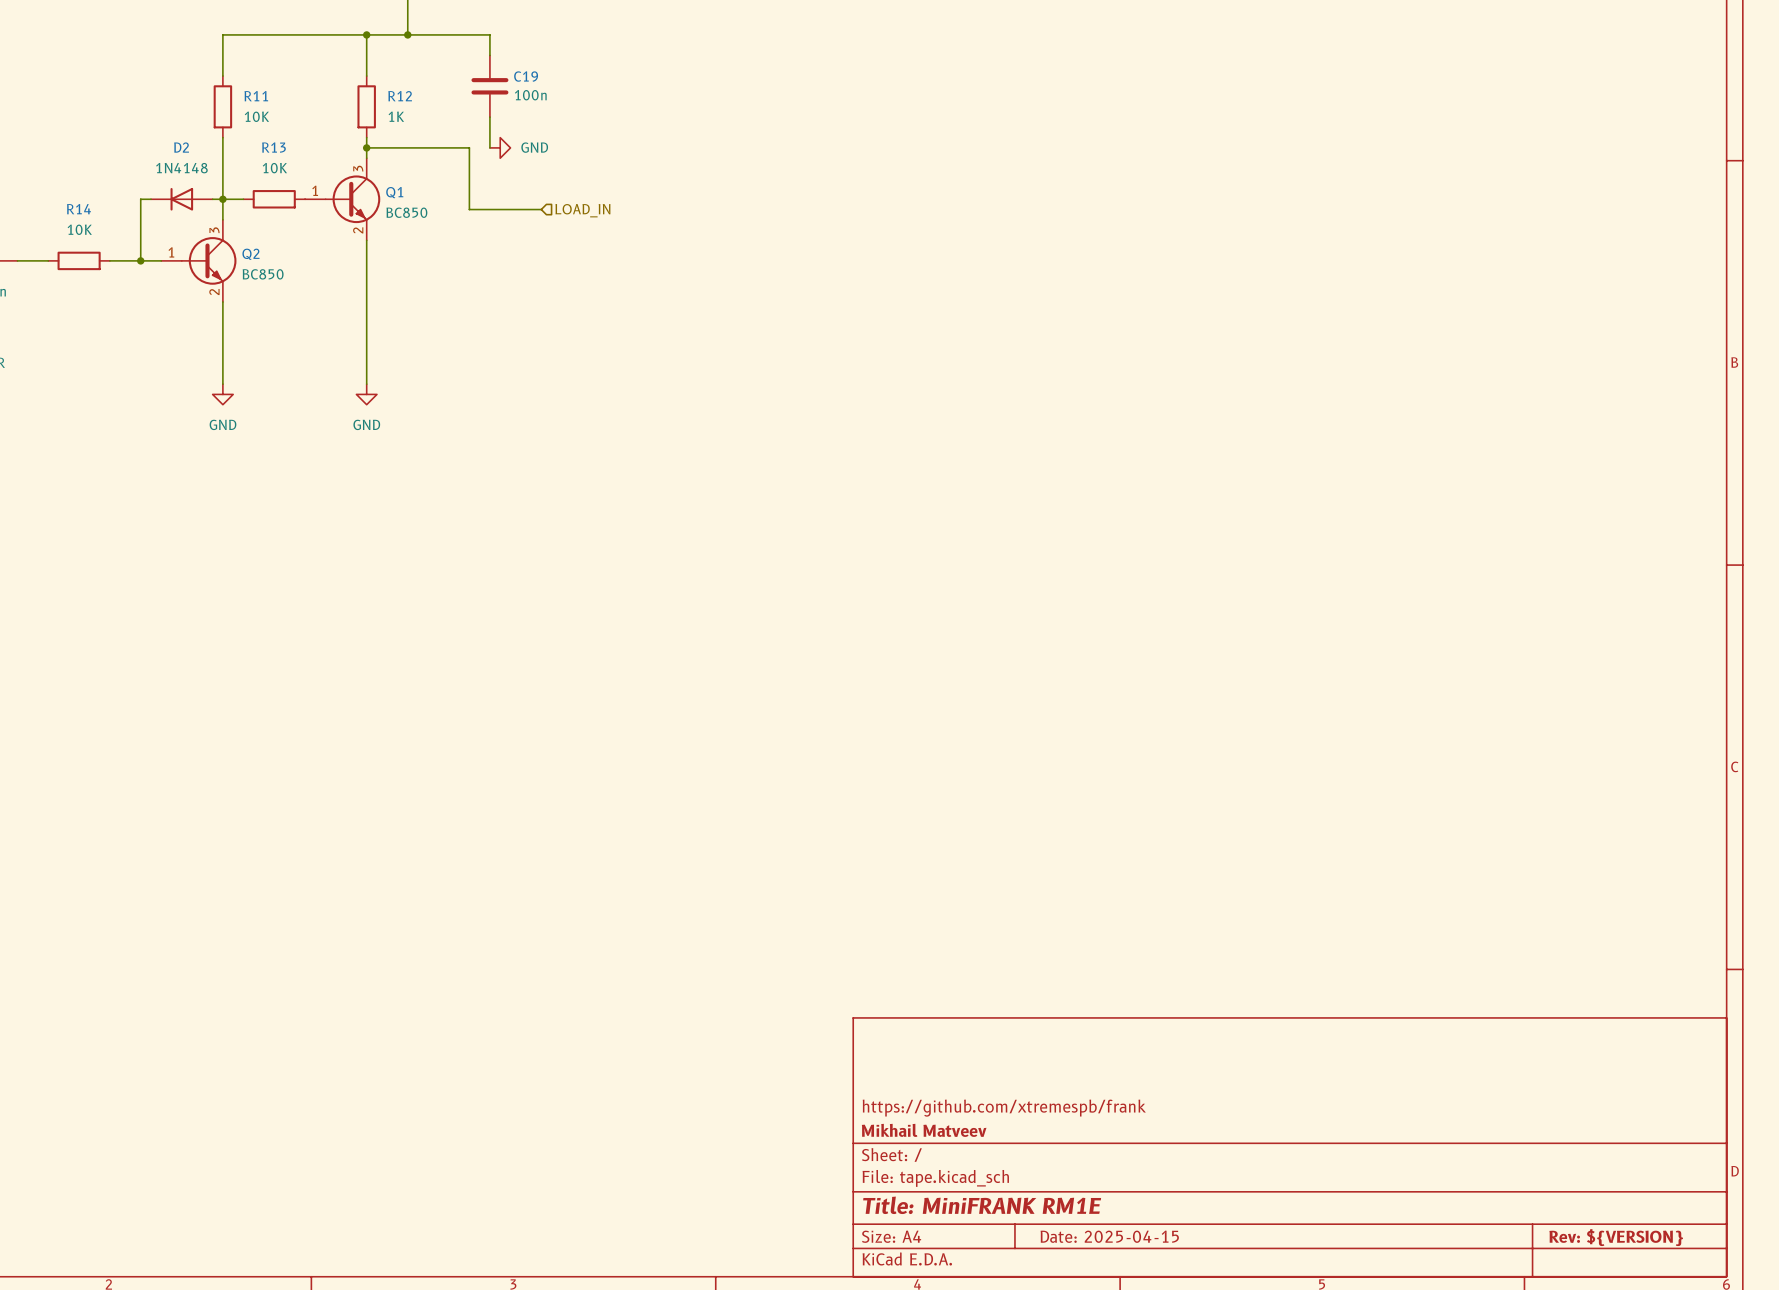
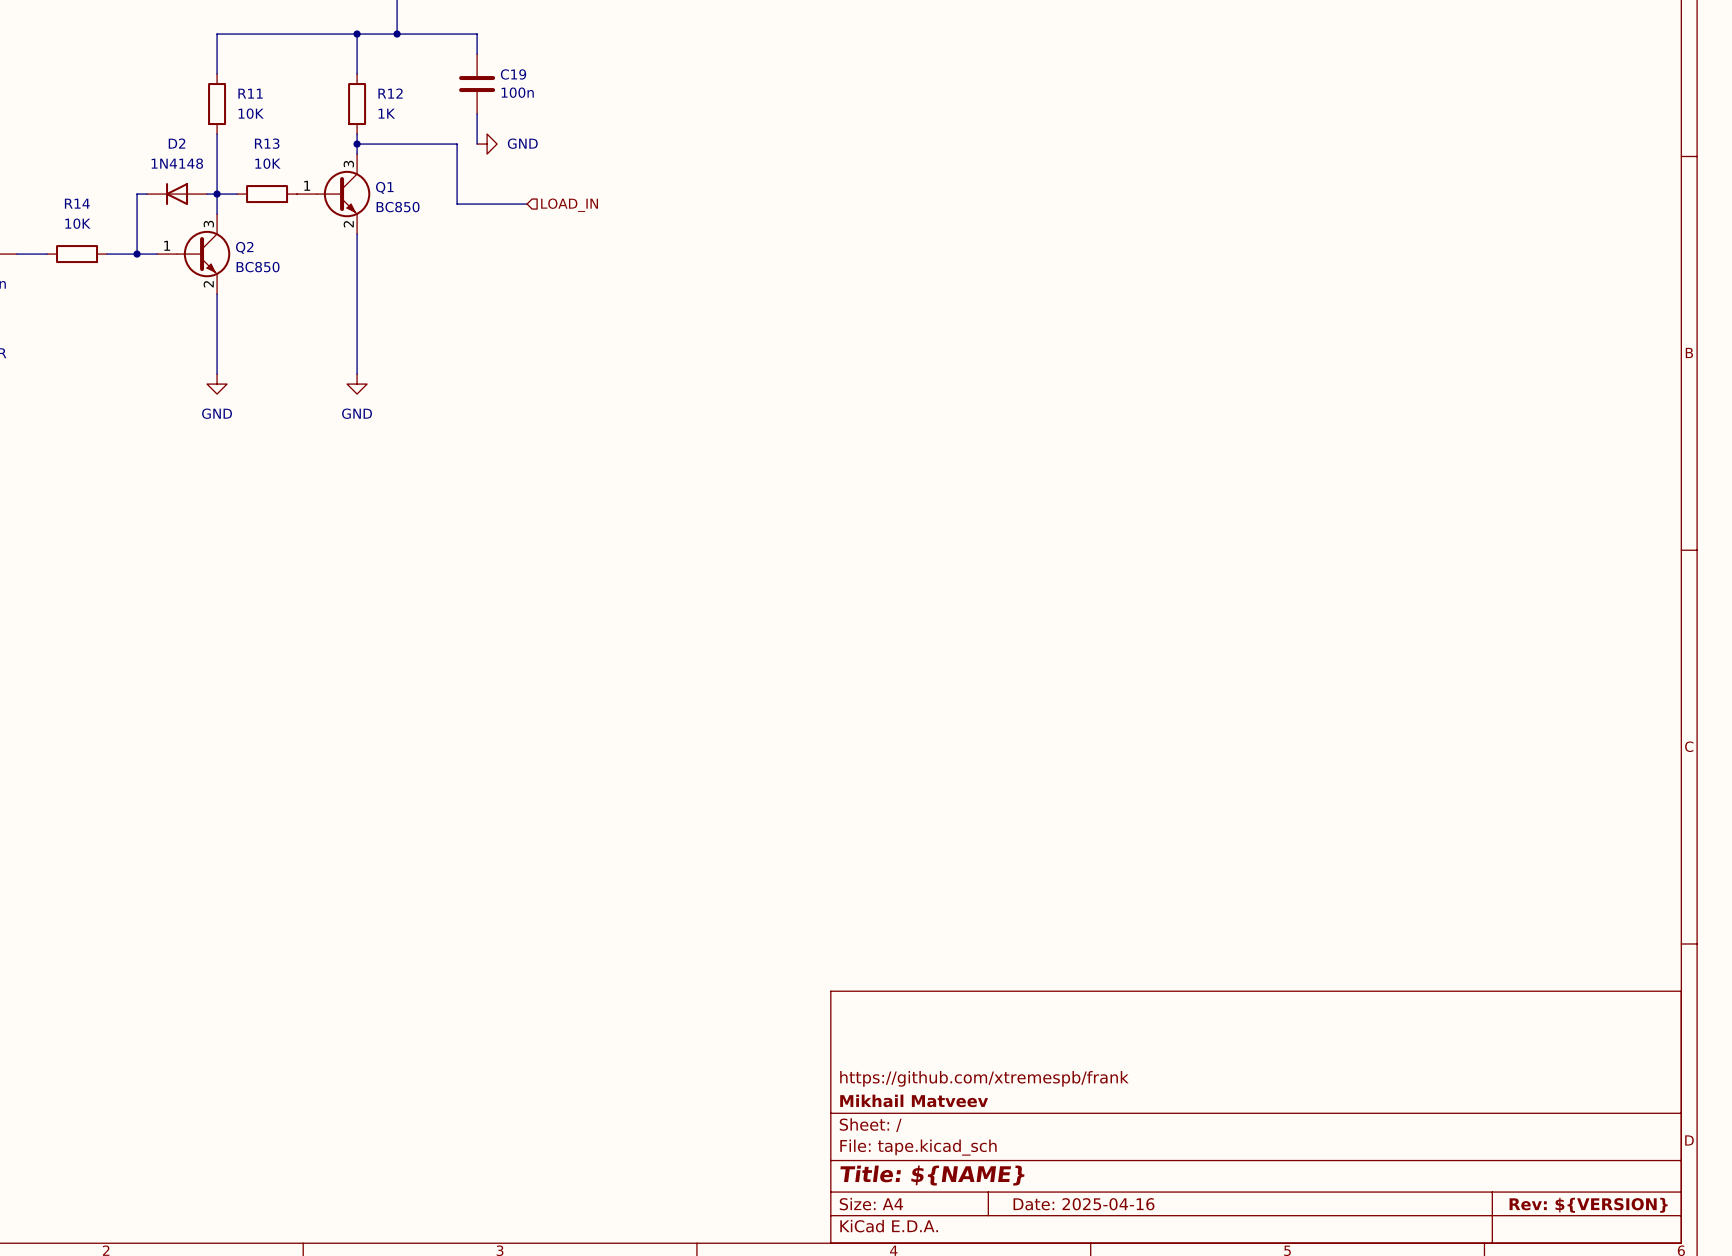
title block: Title: MiniFRANK RM1E (982, 1205) -> Title: ${NAME} (932, 1175)
title block: Date: 2025-04-15 (1109, 1236) -> Date: 2025-04-16 (1083, 1204)

